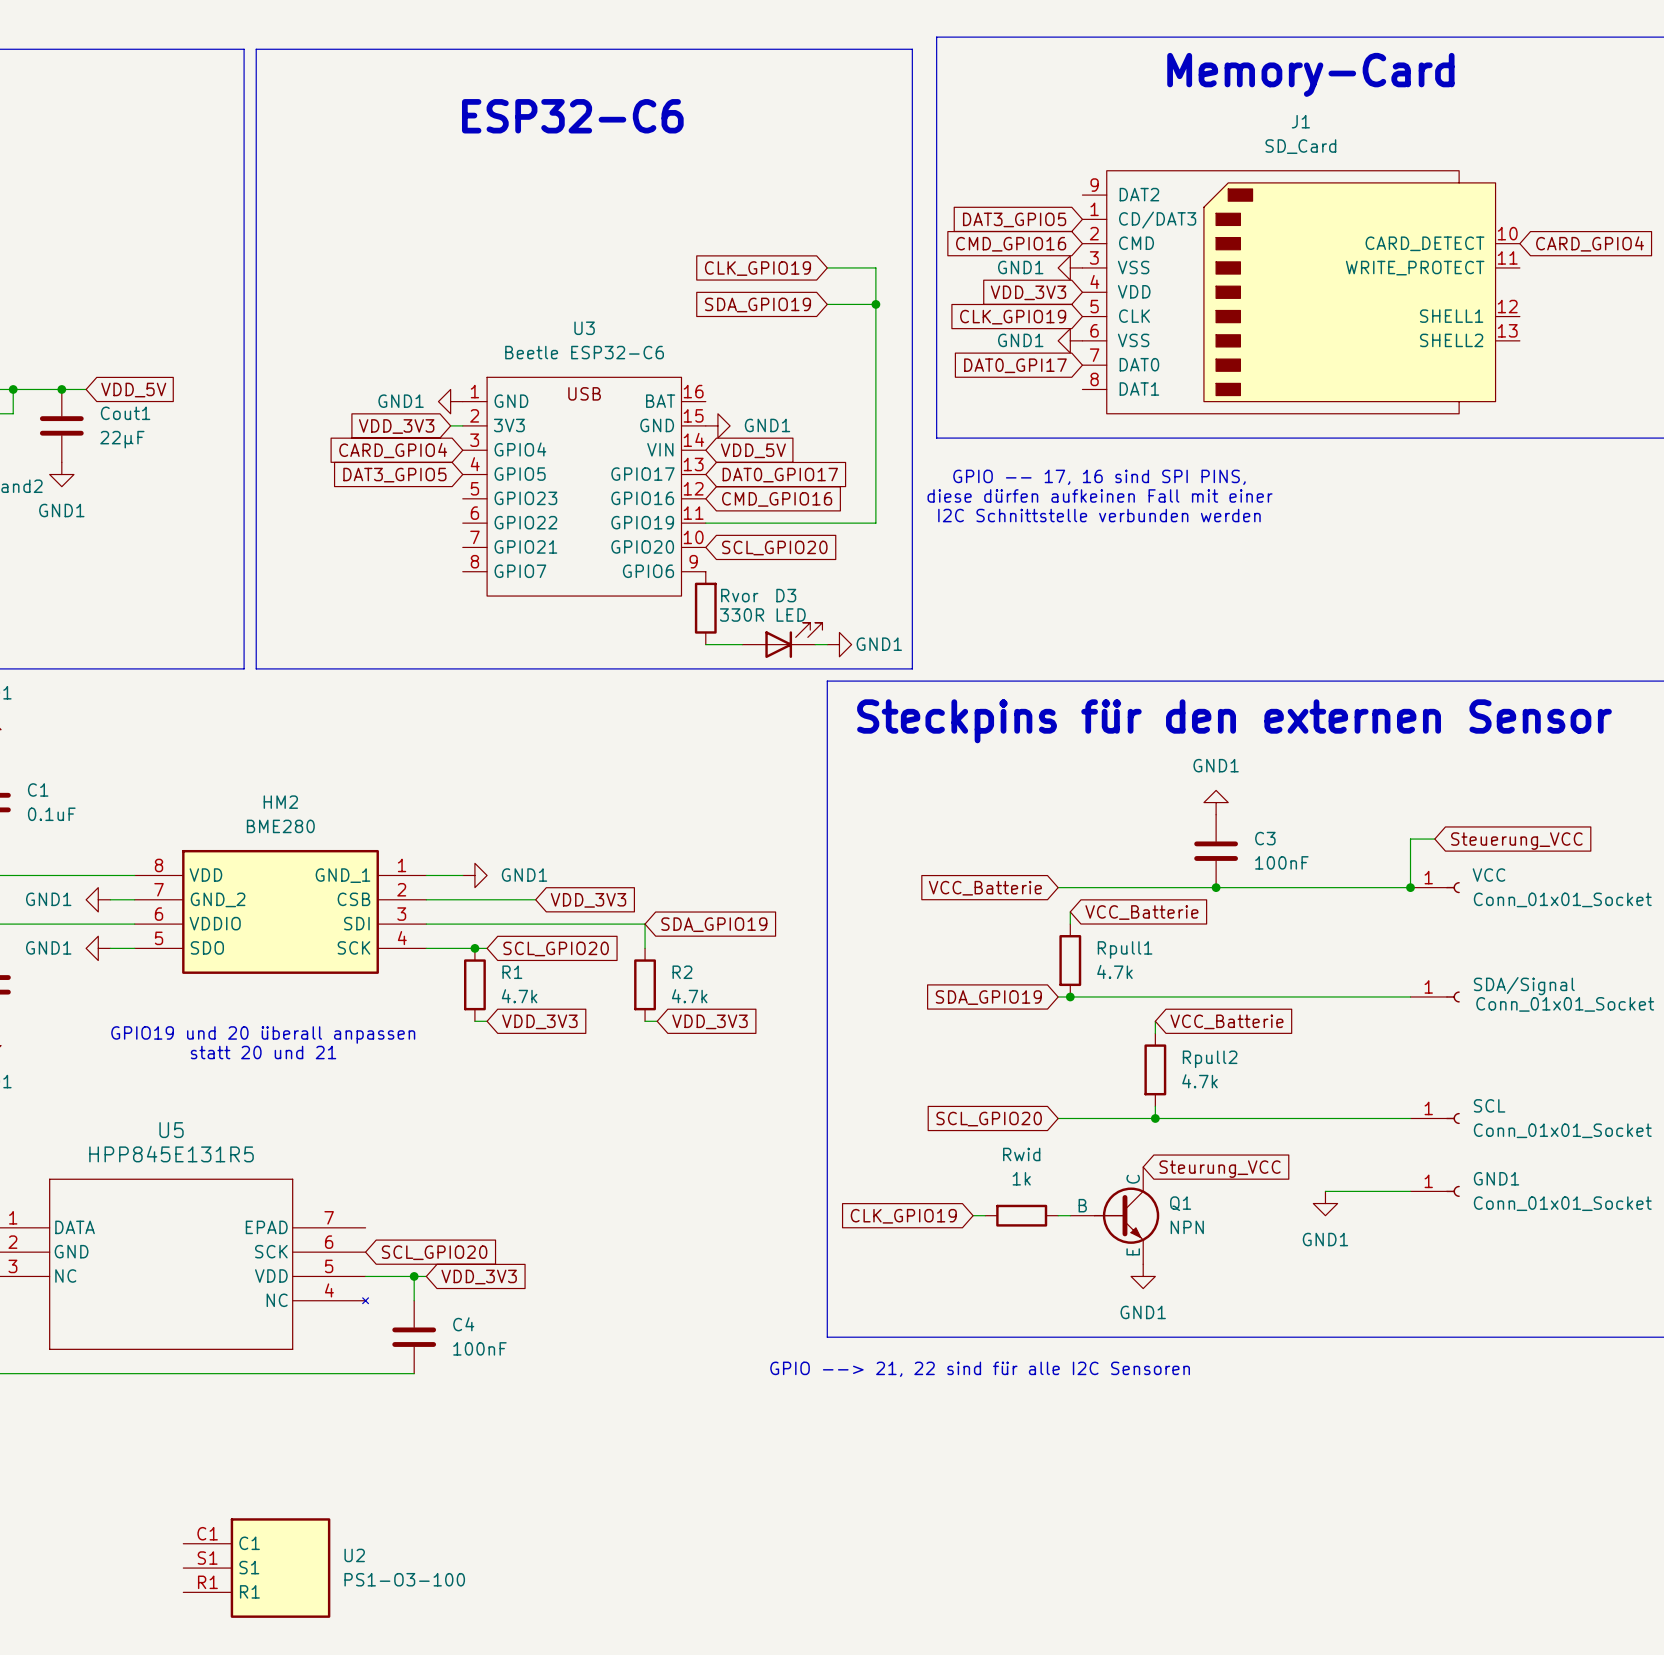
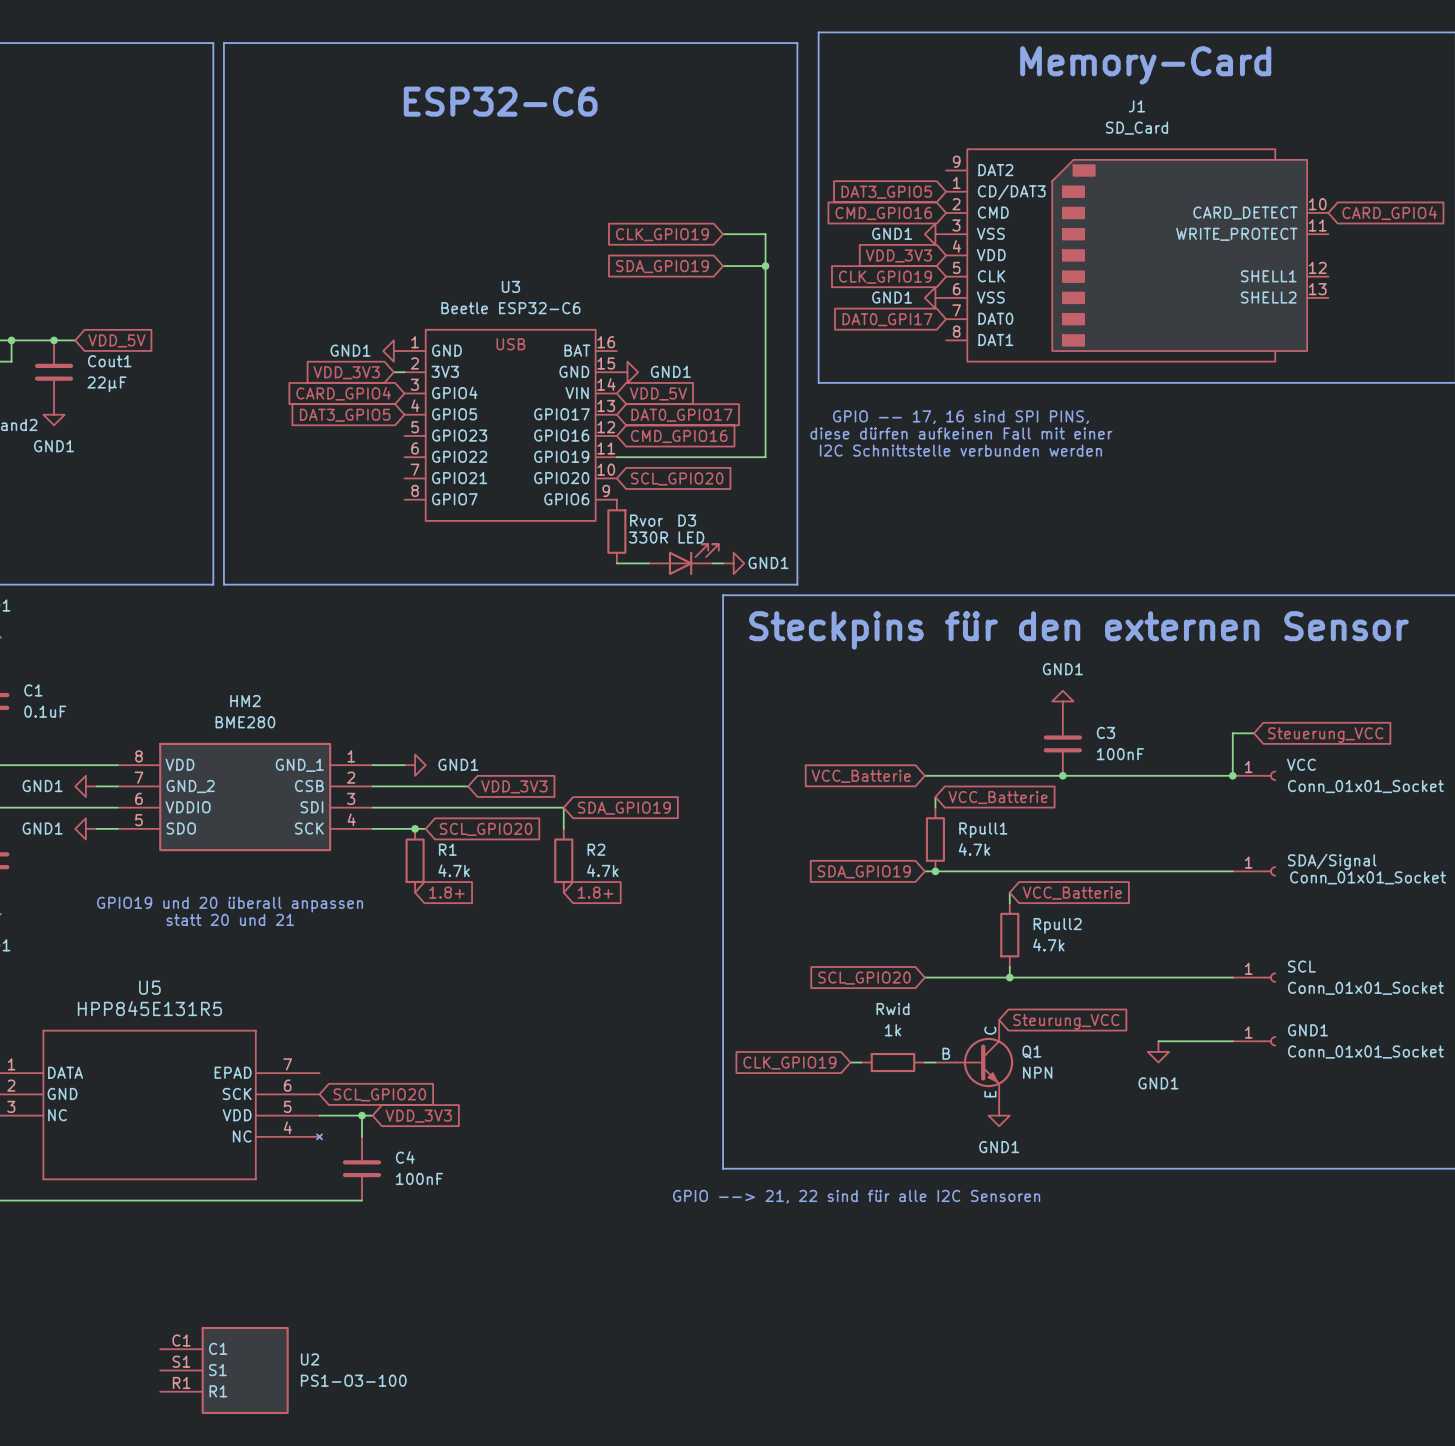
wire: (474, 1021) (487, 1021) -> none
global label: none -> 1.8+ (446, 892)
global label: VDD_3V3 (539, 1021) -> none
wire: (645, 1021) (657, 1021) -> none
global label: none -> 1.8+ (595, 892)
global label: VDD_3V3 (710, 1021) -> none

